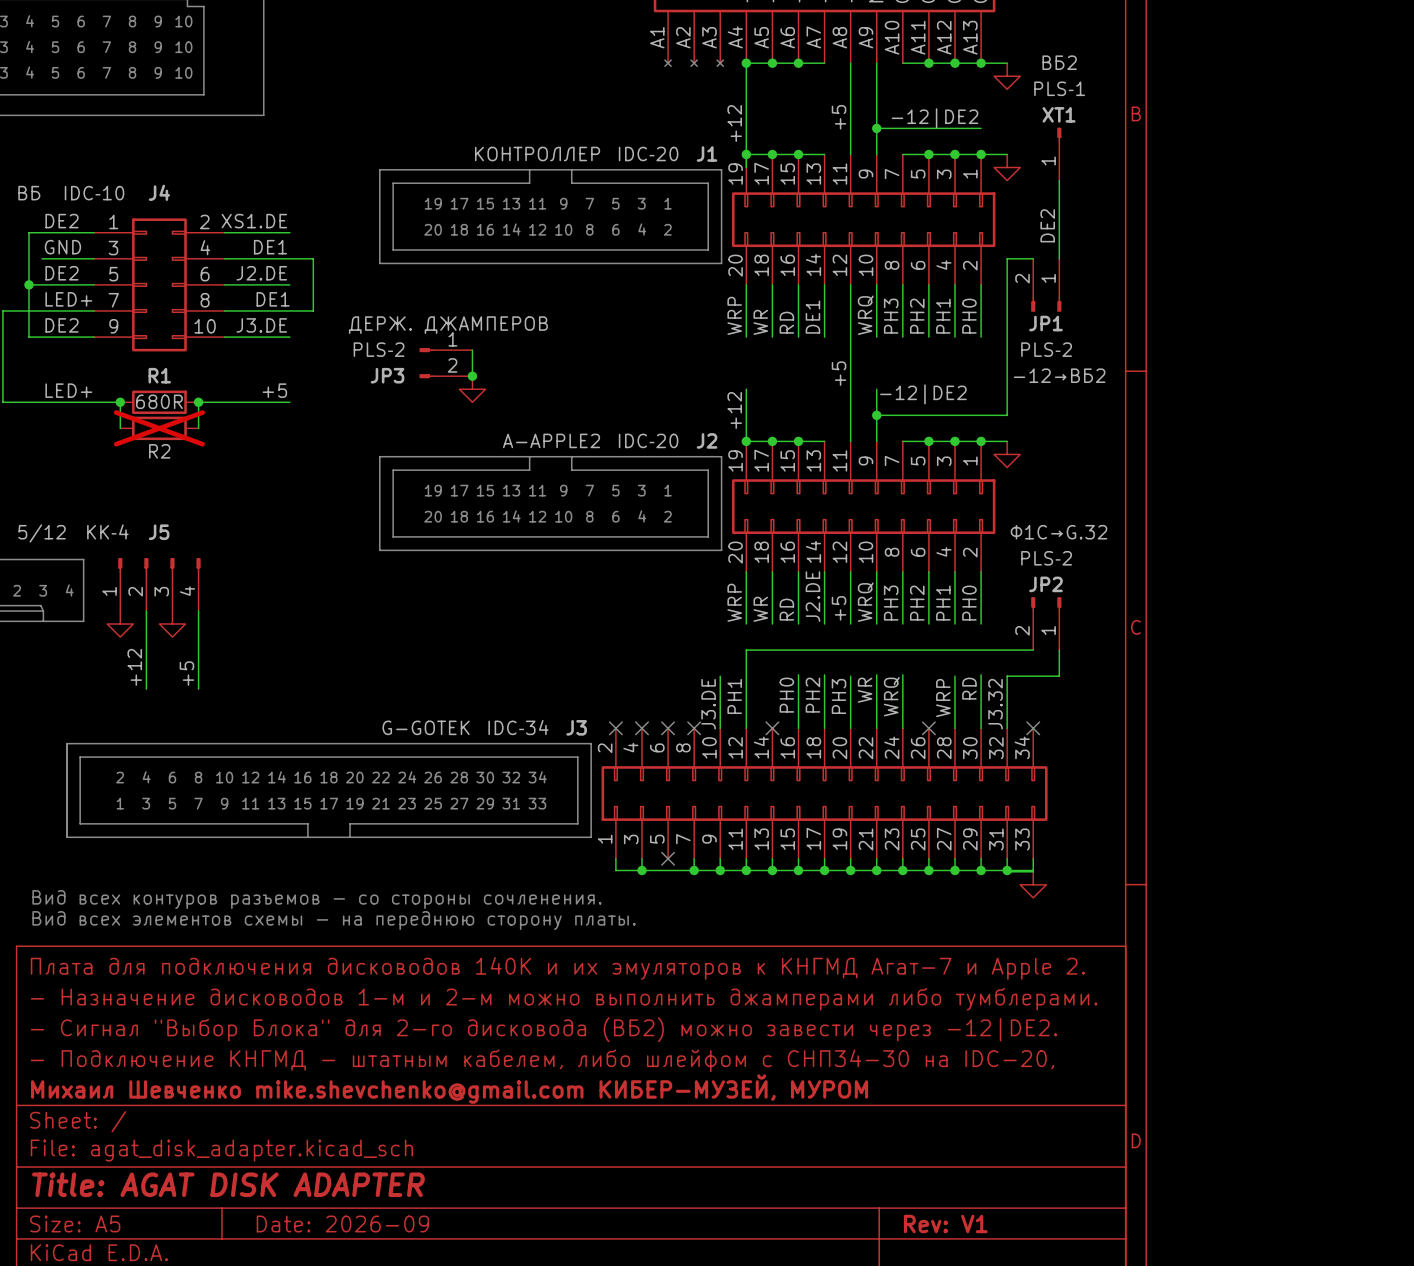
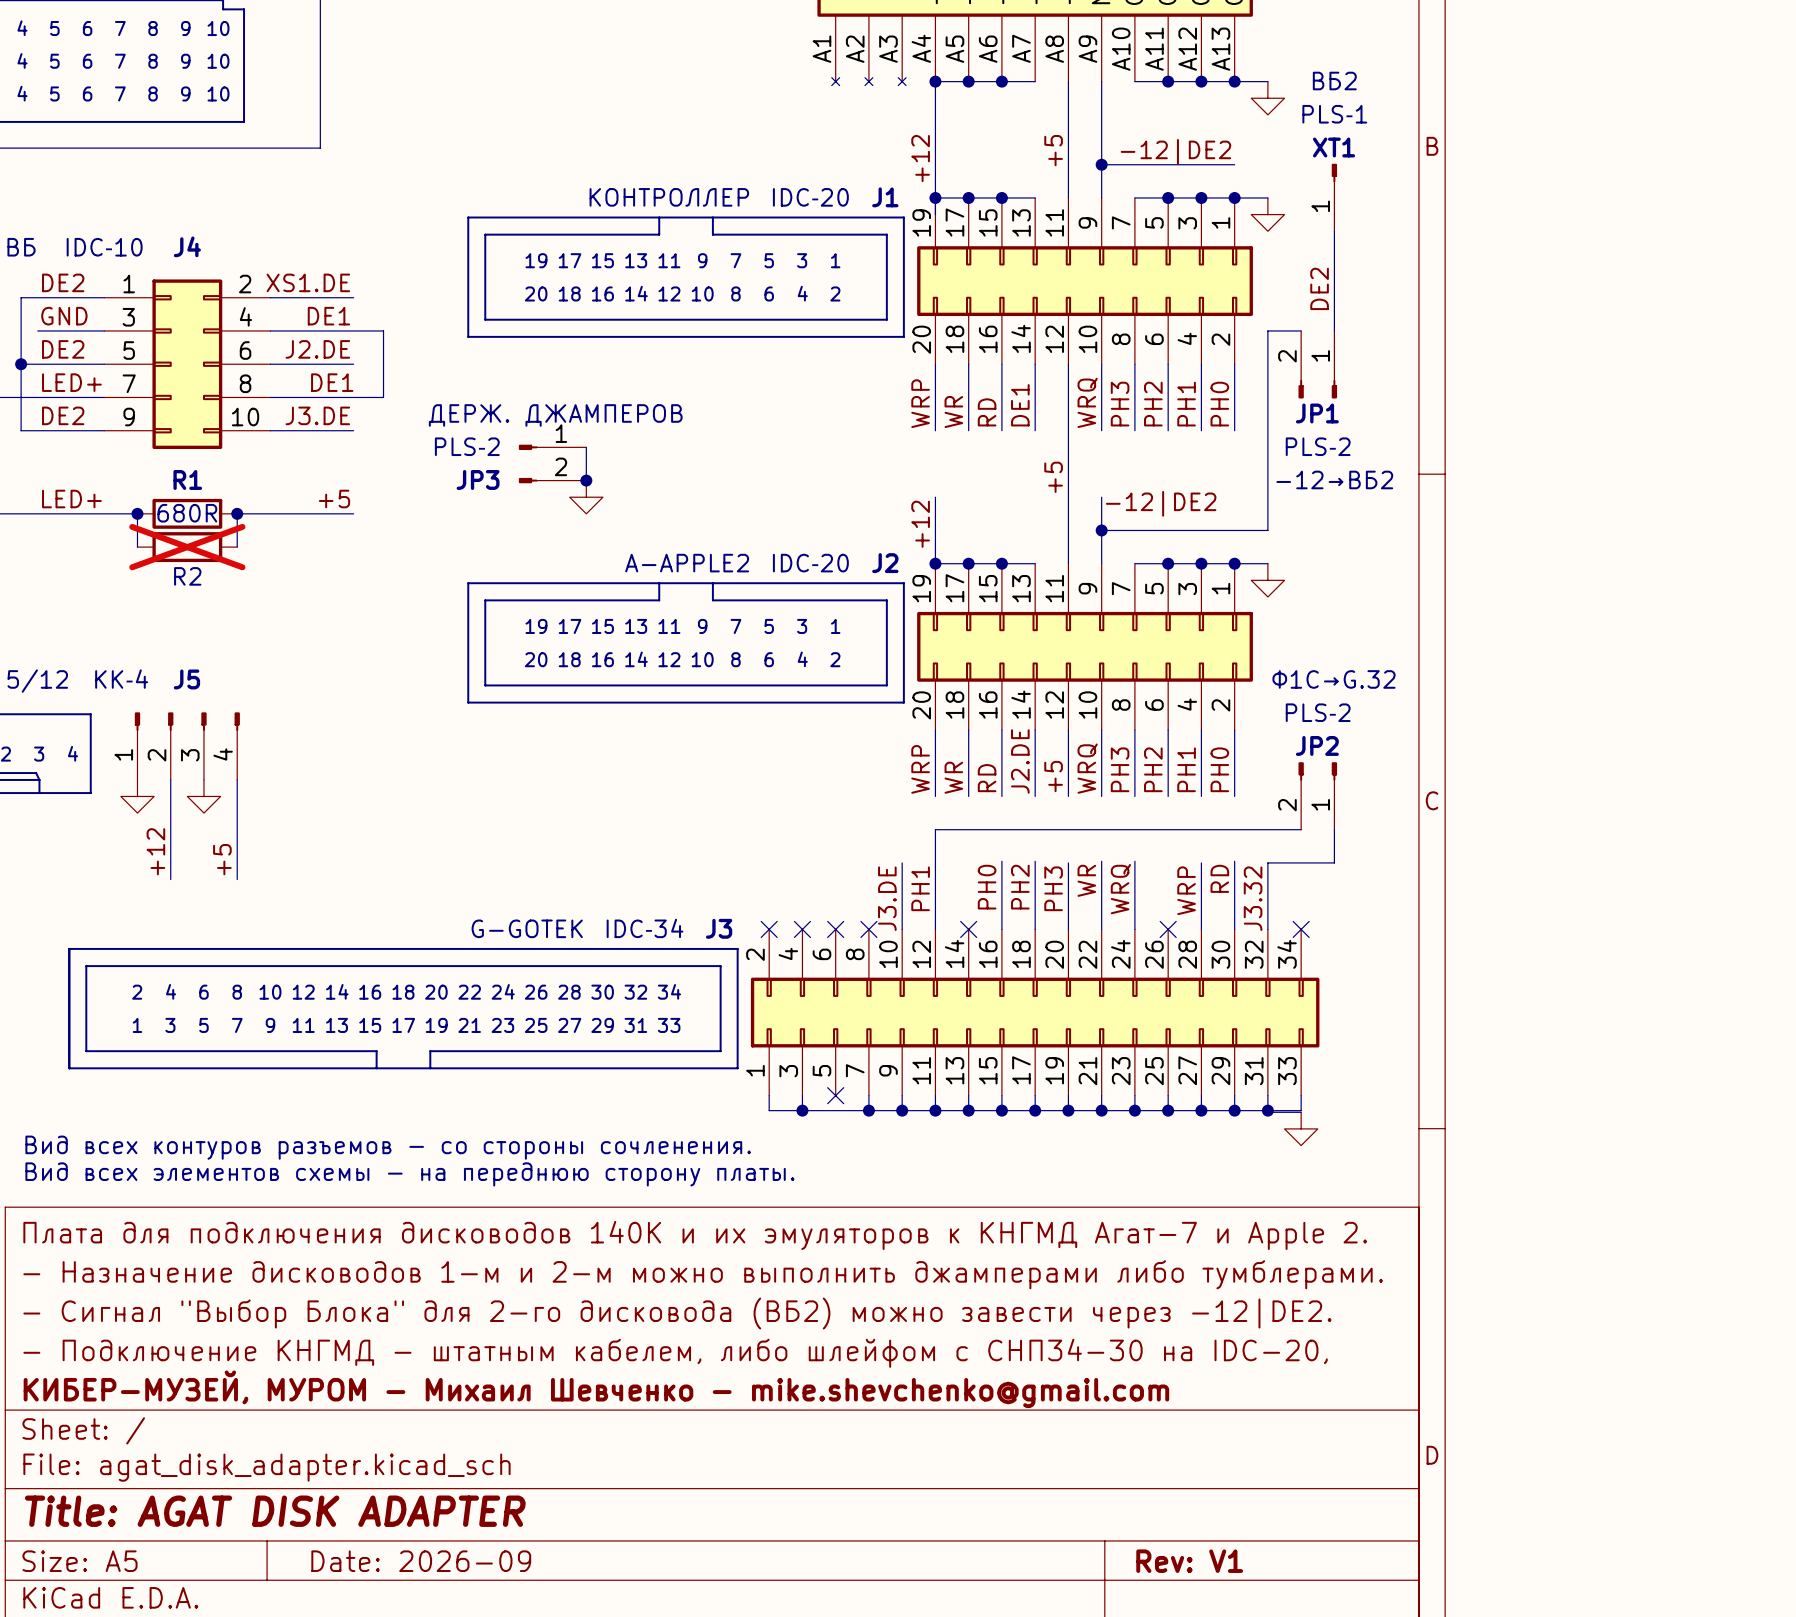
title block: Михаил Шевченко mike.shevchenko@gmail.com КИБЕР-МУЗЕЙ, МУРОМ (449, 1089) -> КИБЕР-МУЗЕЙ, МУРОМ - Михаил Шевченко - mike.shevchenko@gmail.com (596, 1389)

